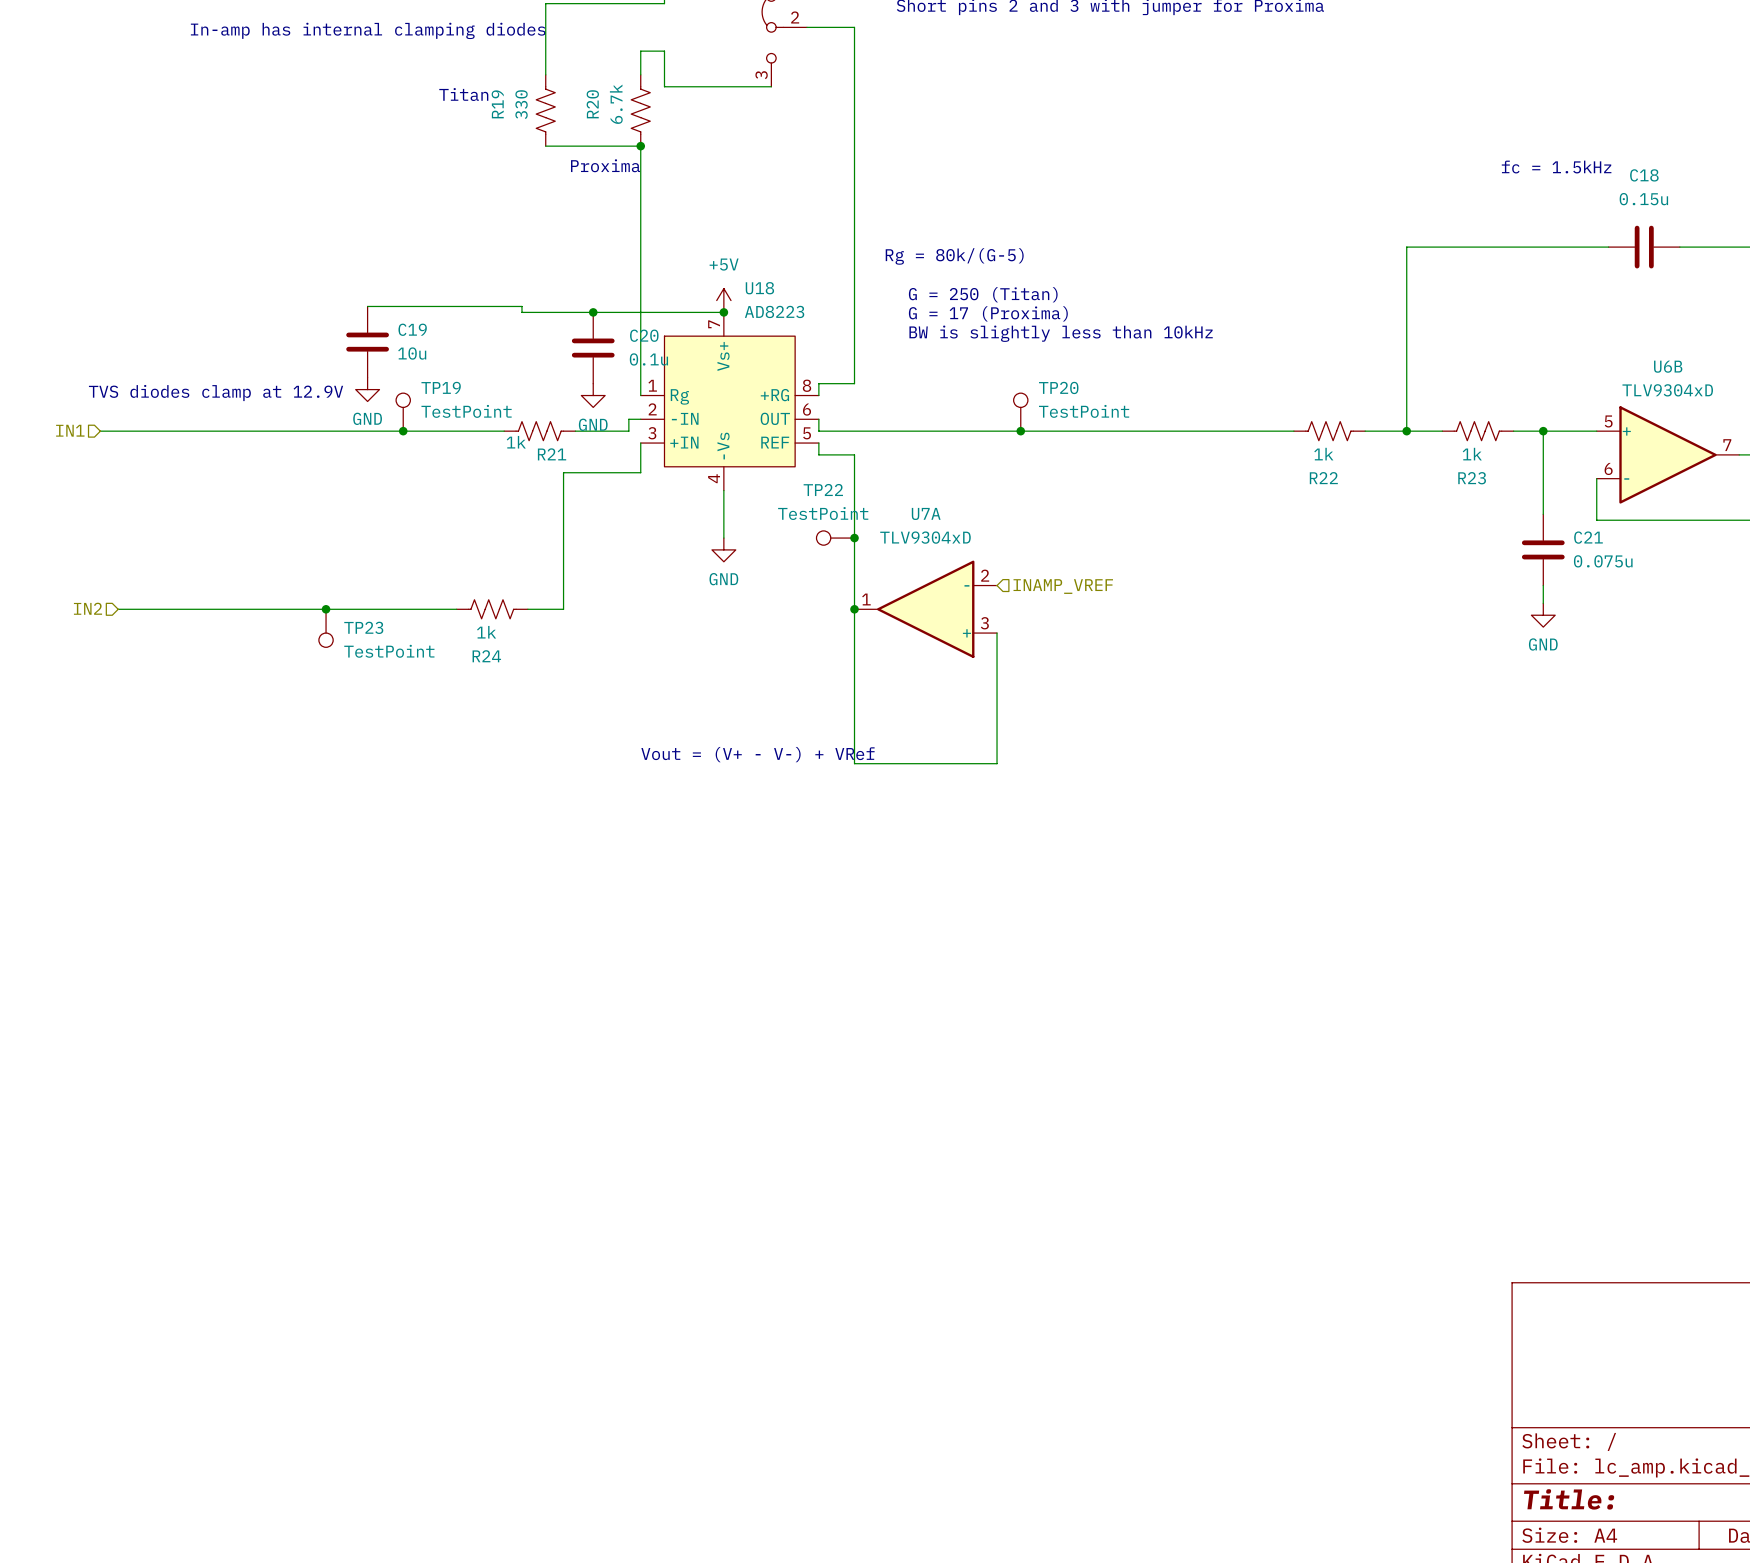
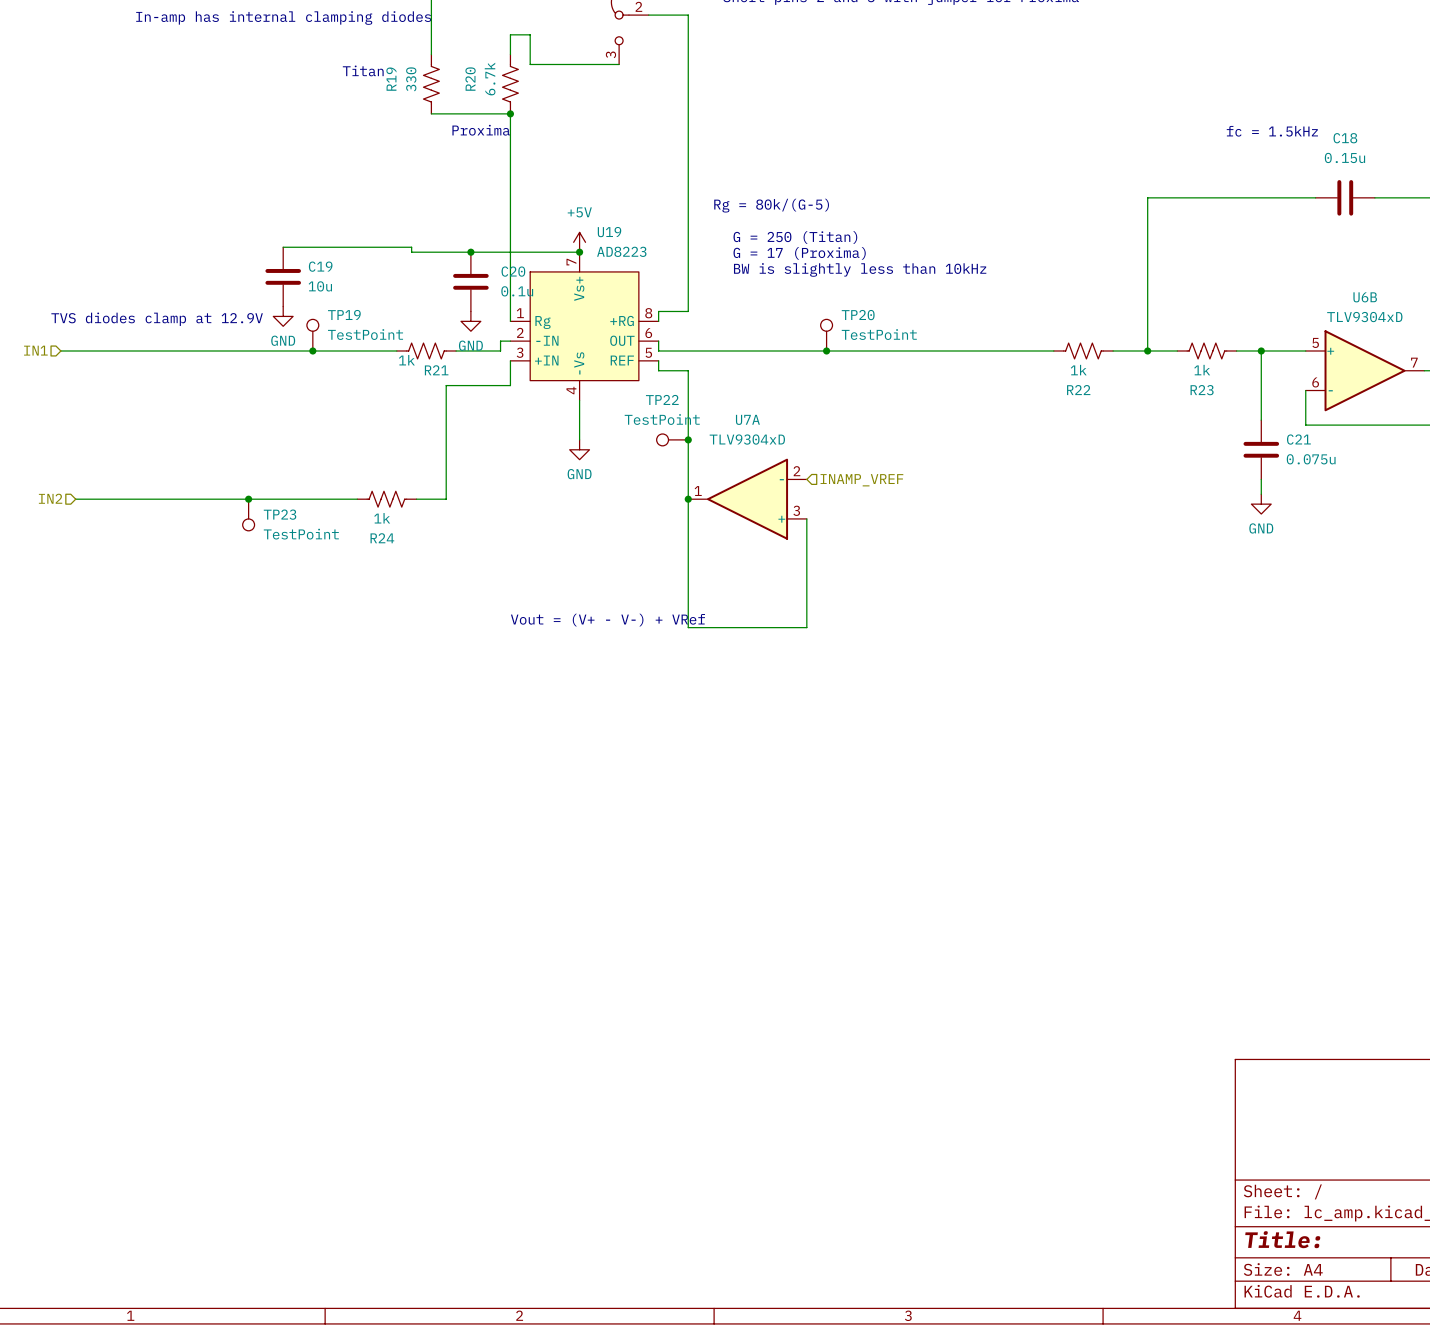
U18 name: U18 (759, 288) -> U19 (609, 232)

